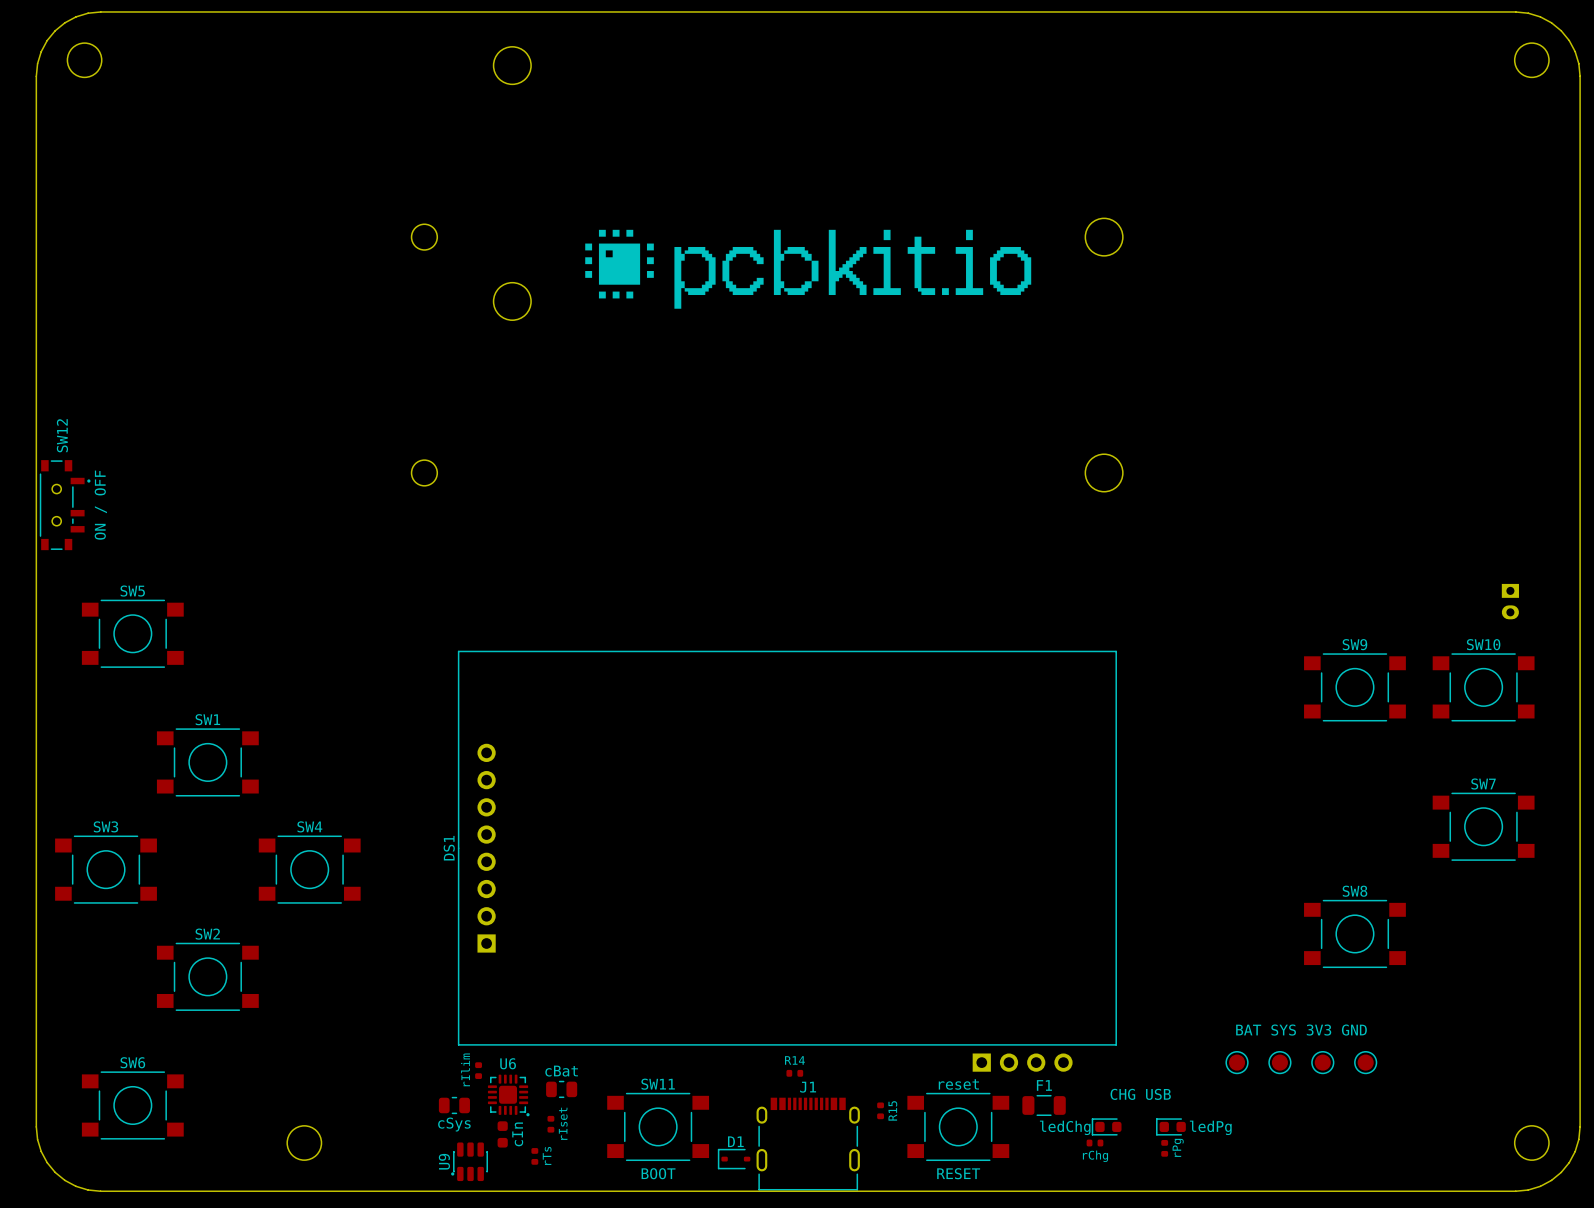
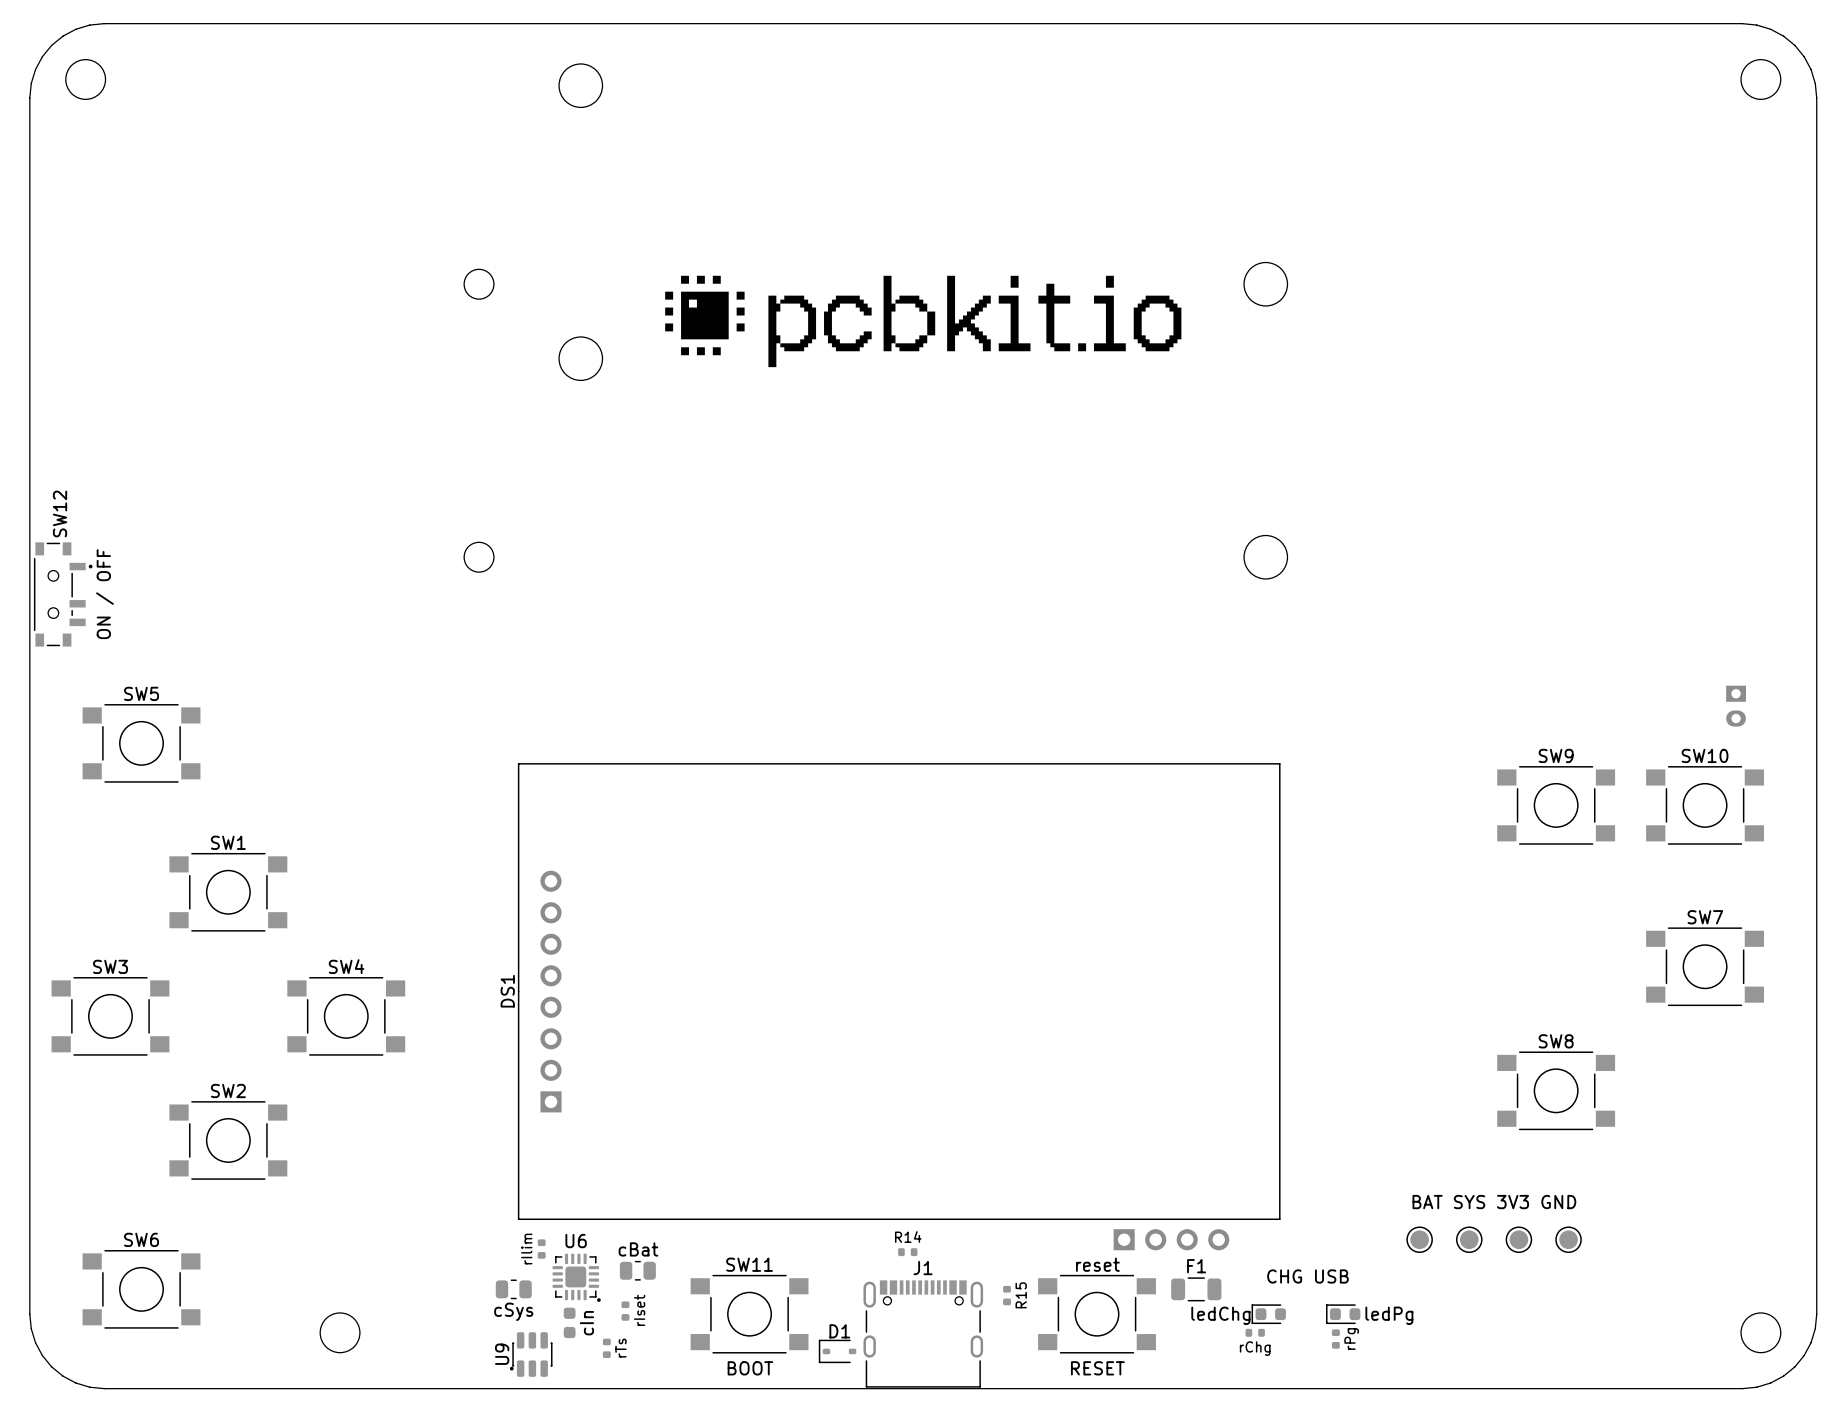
J1 footprint: [756, 1097, 860, 1191] -> [863, 1280, 984, 1388]

